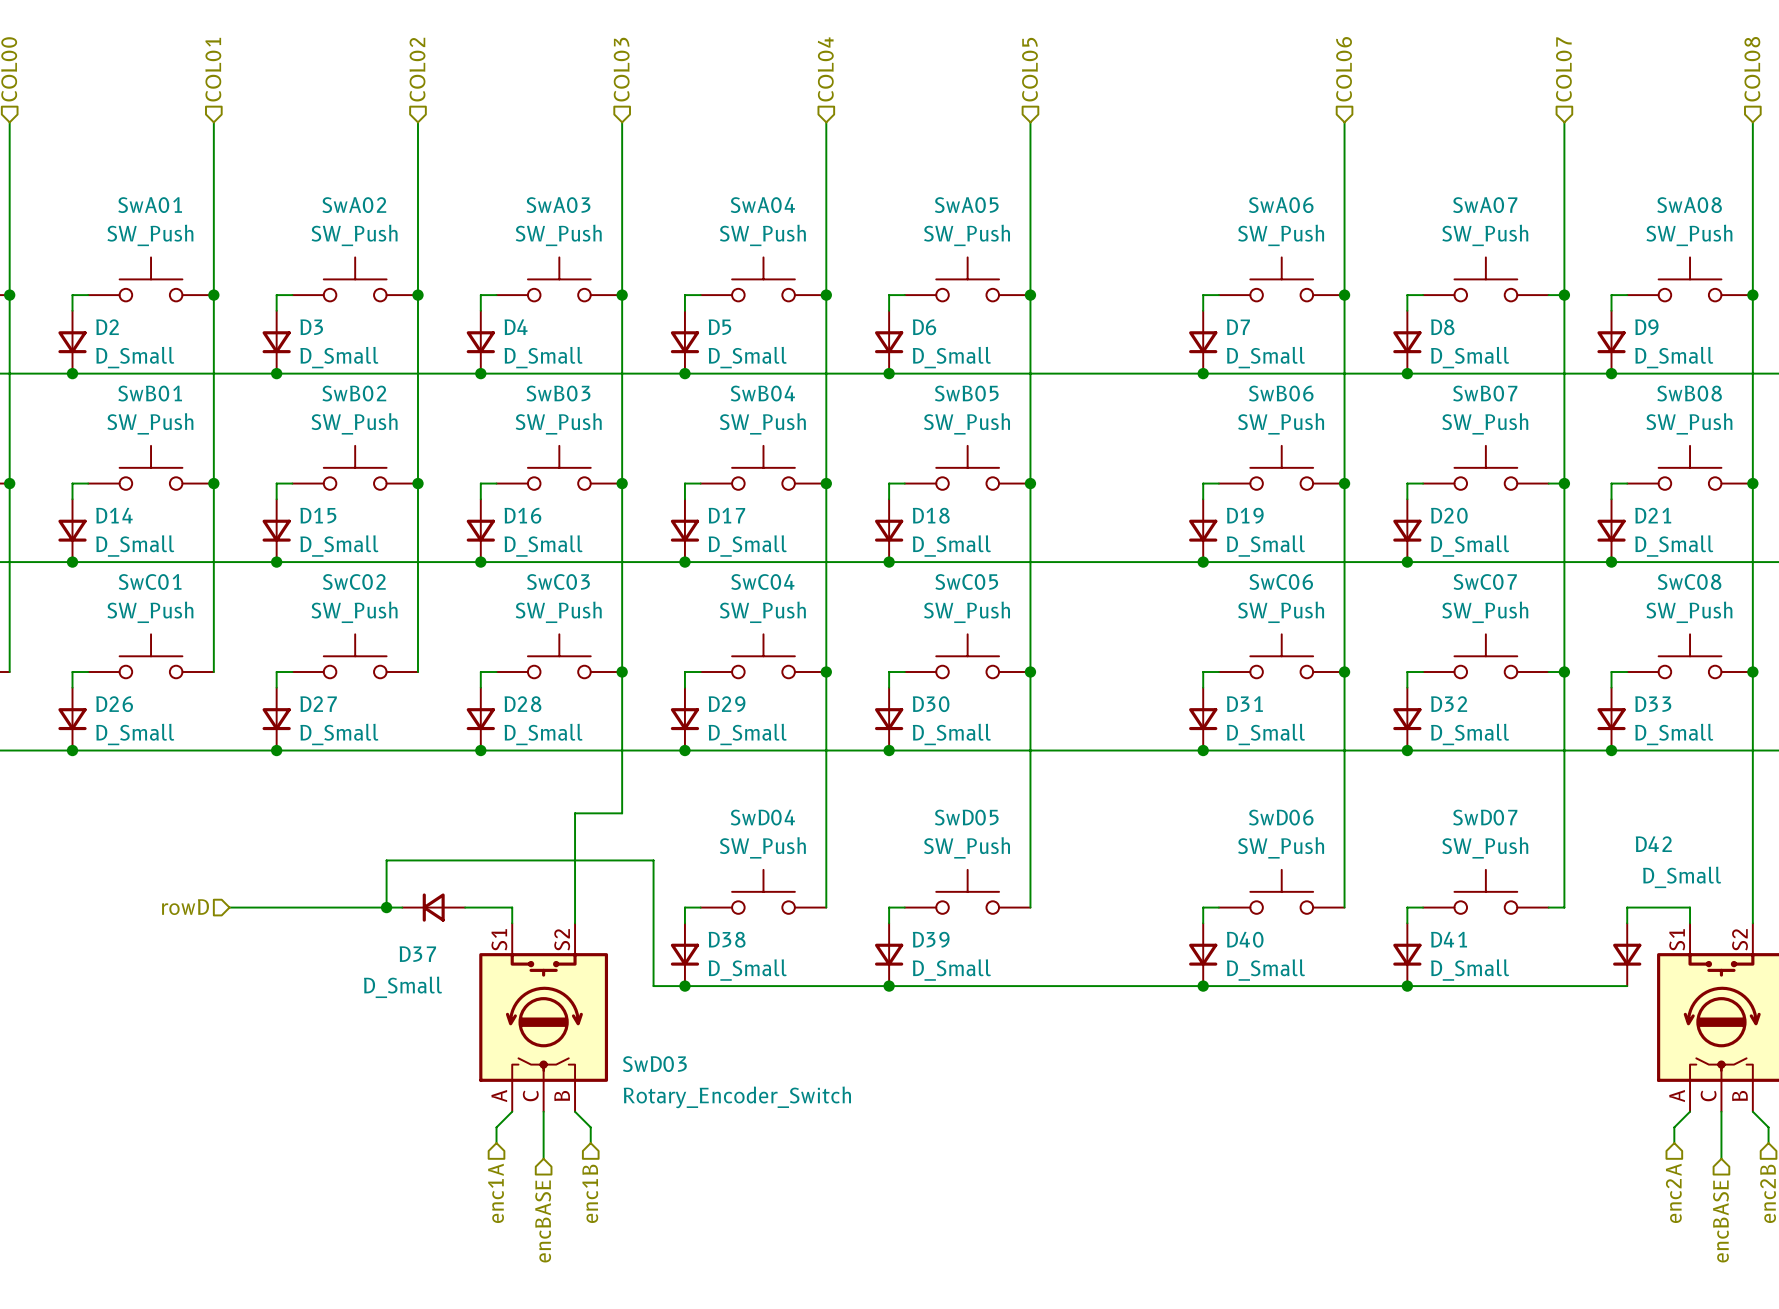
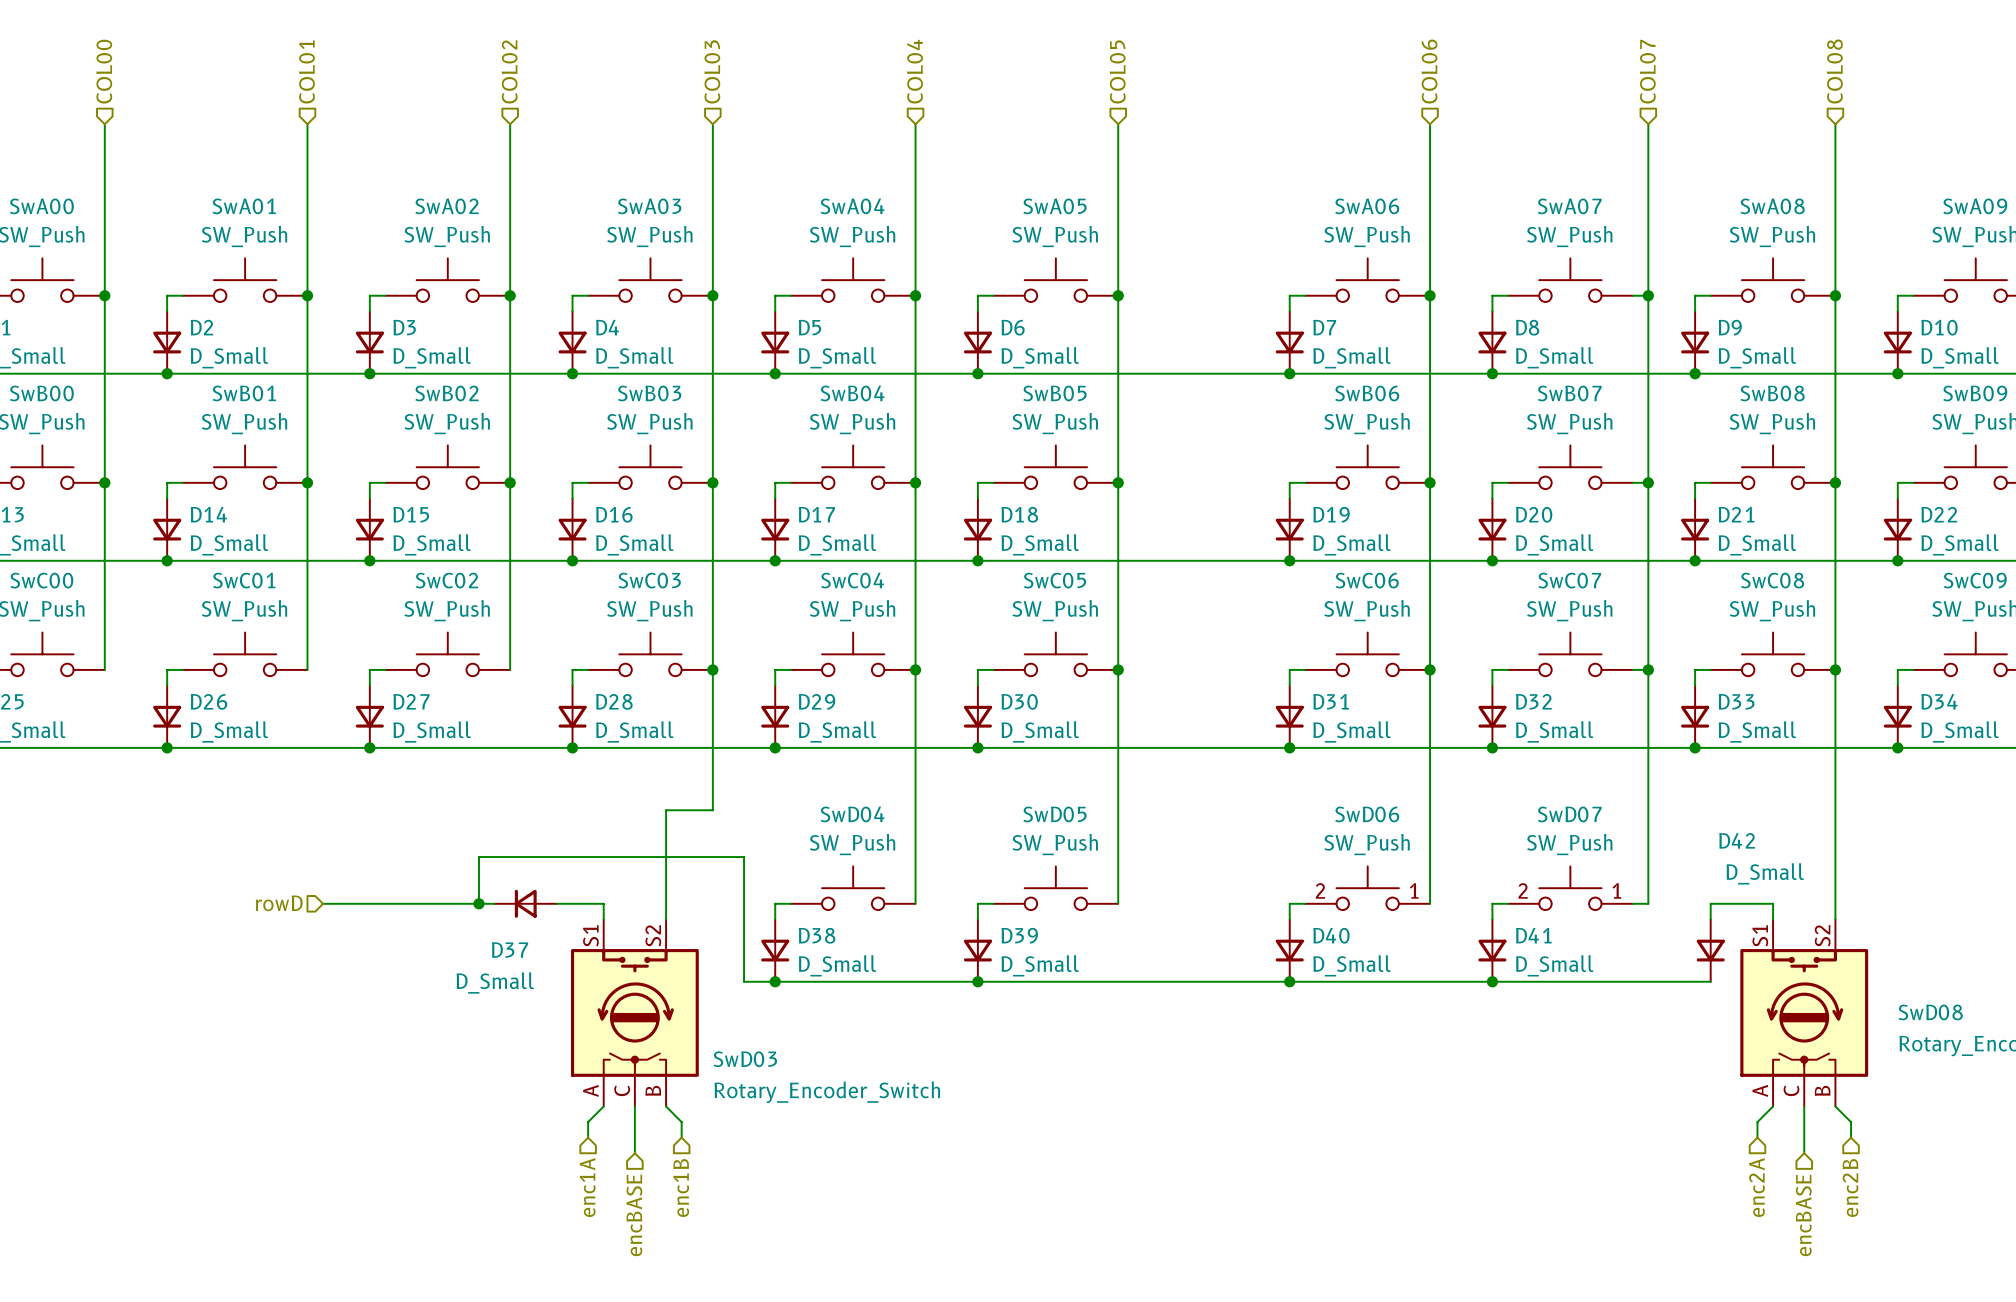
SwD06 pin number: none -> 2 (1320, 890)
SwD06 pin number: none -> 1 (1414, 890)
SwD07 pin number: none -> 2 (1523, 890)
SwD07 pin number: none -> 1 (1616, 890)

